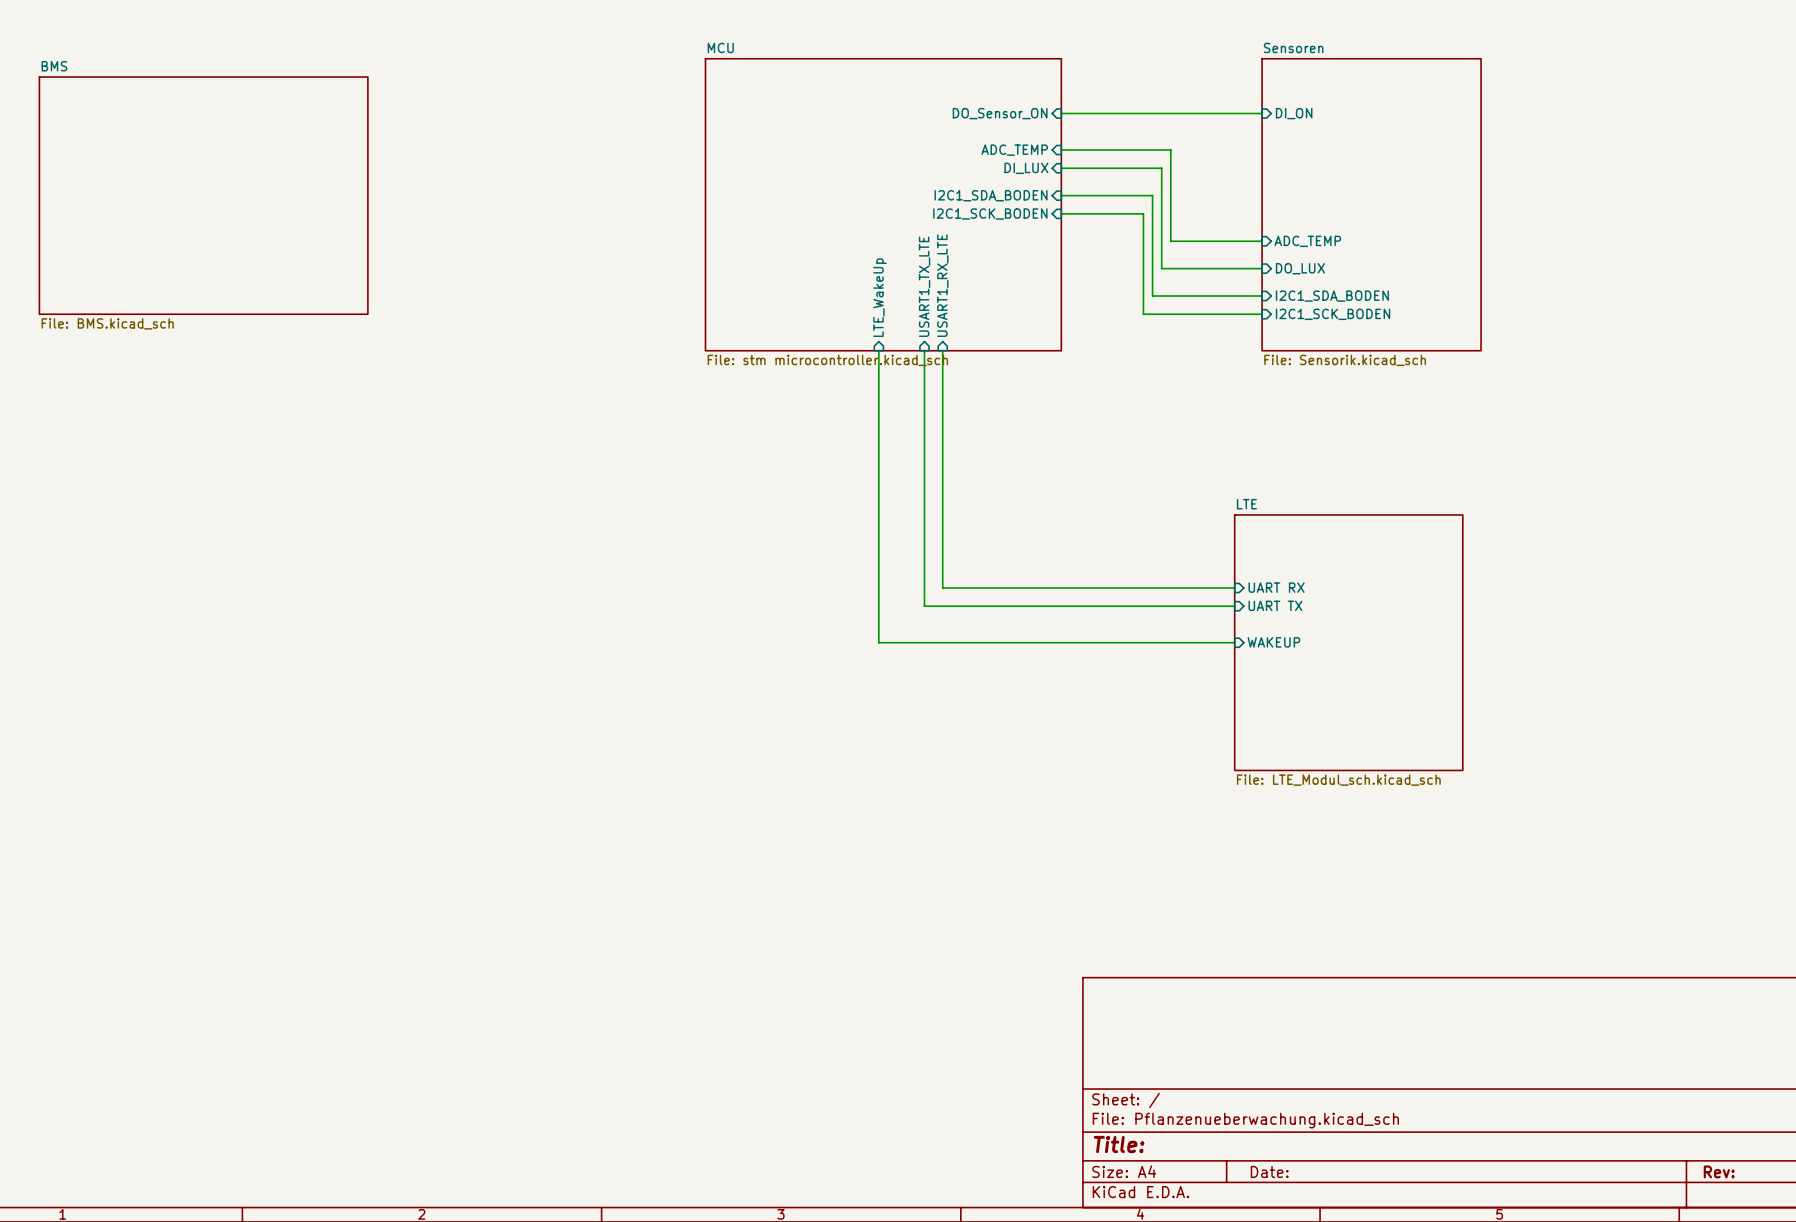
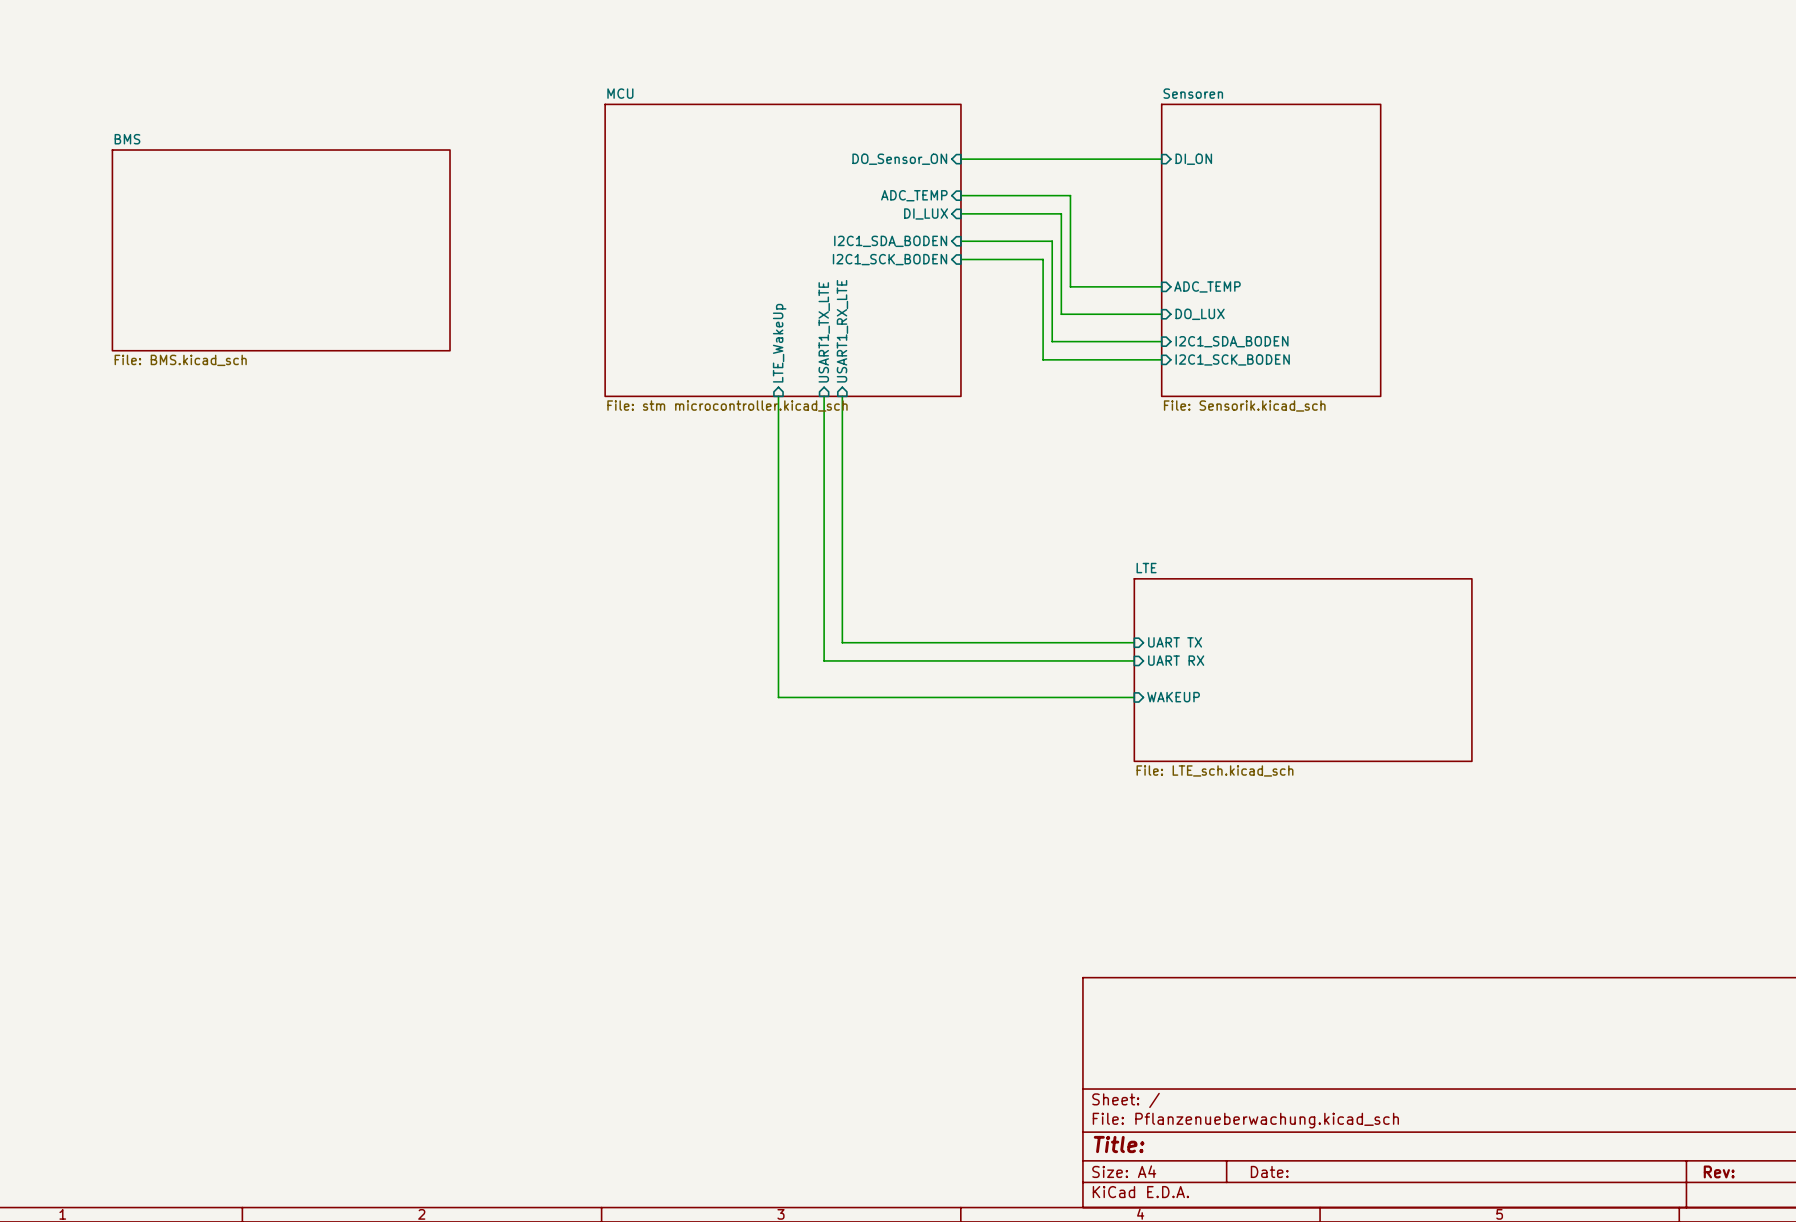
sheet pin position: DO_Sensor_ON (1000, 113) -> DO_Sensor_ON (899, 159)
wire: (1061, 113) (1262, 113) -> (960, 159) (1161, 159)
sheet pin position: DI_ON (1294, 113) -> DI_ON (1193, 159)
sheet pin: ADC_TEMP (1014, 150) -> none
wire: (1061, 150) (1170, 150) (1170, 241) (1262, 241) -> none
sheet pin position: DI_LUX (1026, 168) -> DI_LUX (926, 213)
wire: (1061, 168) (1161, 168) (1161, 268) (1262, 268) -> none
sheet BMS: File: BMS.kicad_sch (203, 195) -> none
sheet pin: none -> ADC_TEMP (914, 195)
wire: none -> (960, 195) (1061, 195)
sheet pin: I2C1_SDA_BODEN (991, 195) -> none
wire: (1070, 195) (1152, 195) (1152, 295) (1262, 295) -> (1070, 195) (1070, 286) (1161, 286)
sheet MCU position: (883, 204) -> (783, 250)
sheet Sensoren position: (1371, 204) -> (1271, 250)
sheet pin: I2C1_SCK_BODEN (990, 213) -> none
wire: (1061, 213) (1143, 213) (1143, 314) -> (960, 213) (1061, 213) (1061, 314) (1143, 314)
sheet pin: none -> I2C1_SDA_BODEN (890, 241)
wire: none -> (960, 241) (1052, 241) (1052, 341) (1161, 341)
sheet pin: ADC_TEMP (1307, 241) -> none
sheet BMS: none -> File: BMS.kicad_sch (281, 250)
sheet pin: none -> I2C1_SCK_BODEN (890, 259)
wire: none -> (960, 259) (1043, 259) (1043, 359) (1161, 359)
sheet pin position: DO_LUX (1300, 268) -> DO_LUX (1200, 314)
sheet pin position: USART1_RX_LTE (942, 285) -> USART1_RX_LTE (842, 331)
sheet pin position: USART1_TX_LTE (924, 286) -> USART1_TX_LTE (824, 332)
sheet pin: none -> ADC_TEMP (1207, 286)
sheet pin: I2C1_SDA_BODEN (1332, 296) -> none
sheet pin position: LTE_WakeUp (880, 297) -> LTE_WakeUp (779, 343)
wire: (1161, 314) (1262, 314) -> none
sheet pin: I2C1_SCK_BODEN (1333, 314) -> none
sheet pin: none -> I2C1_SDA_BODEN (1232, 341)
wire: (878, 350) (878, 642) -> (842, 396) (842, 642) (878, 642)
wire: (924, 350) (924, 606) (1234, 606) -> none
wire: (942, 350) (942, 587) (1234, 587) -> none
sheet pin: none -> I2C1_SCK_BODEN (1232, 359)
wire: none -> (778, 396) (778, 697) (1134, 697)
wire: none -> (824, 396) (824, 660) (1134, 660)
sheet pin position: UART RX (1276, 587) -> UART RX (1176, 660)
sheet pin position: UART TX (1275, 605) -> UART TX (1175, 642)
wire: (1134, 642) (1234, 642) -> none
sheet pin position: WAKEUP (1273, 642) -> WAKEUP (1173, 697)
sheet LTE: File: LTE_Modul_sch.kicad_sch (1348, 642) -> none
sheet LTE: none -> File: LTE_sch.kicad_sch (1303, 670)

